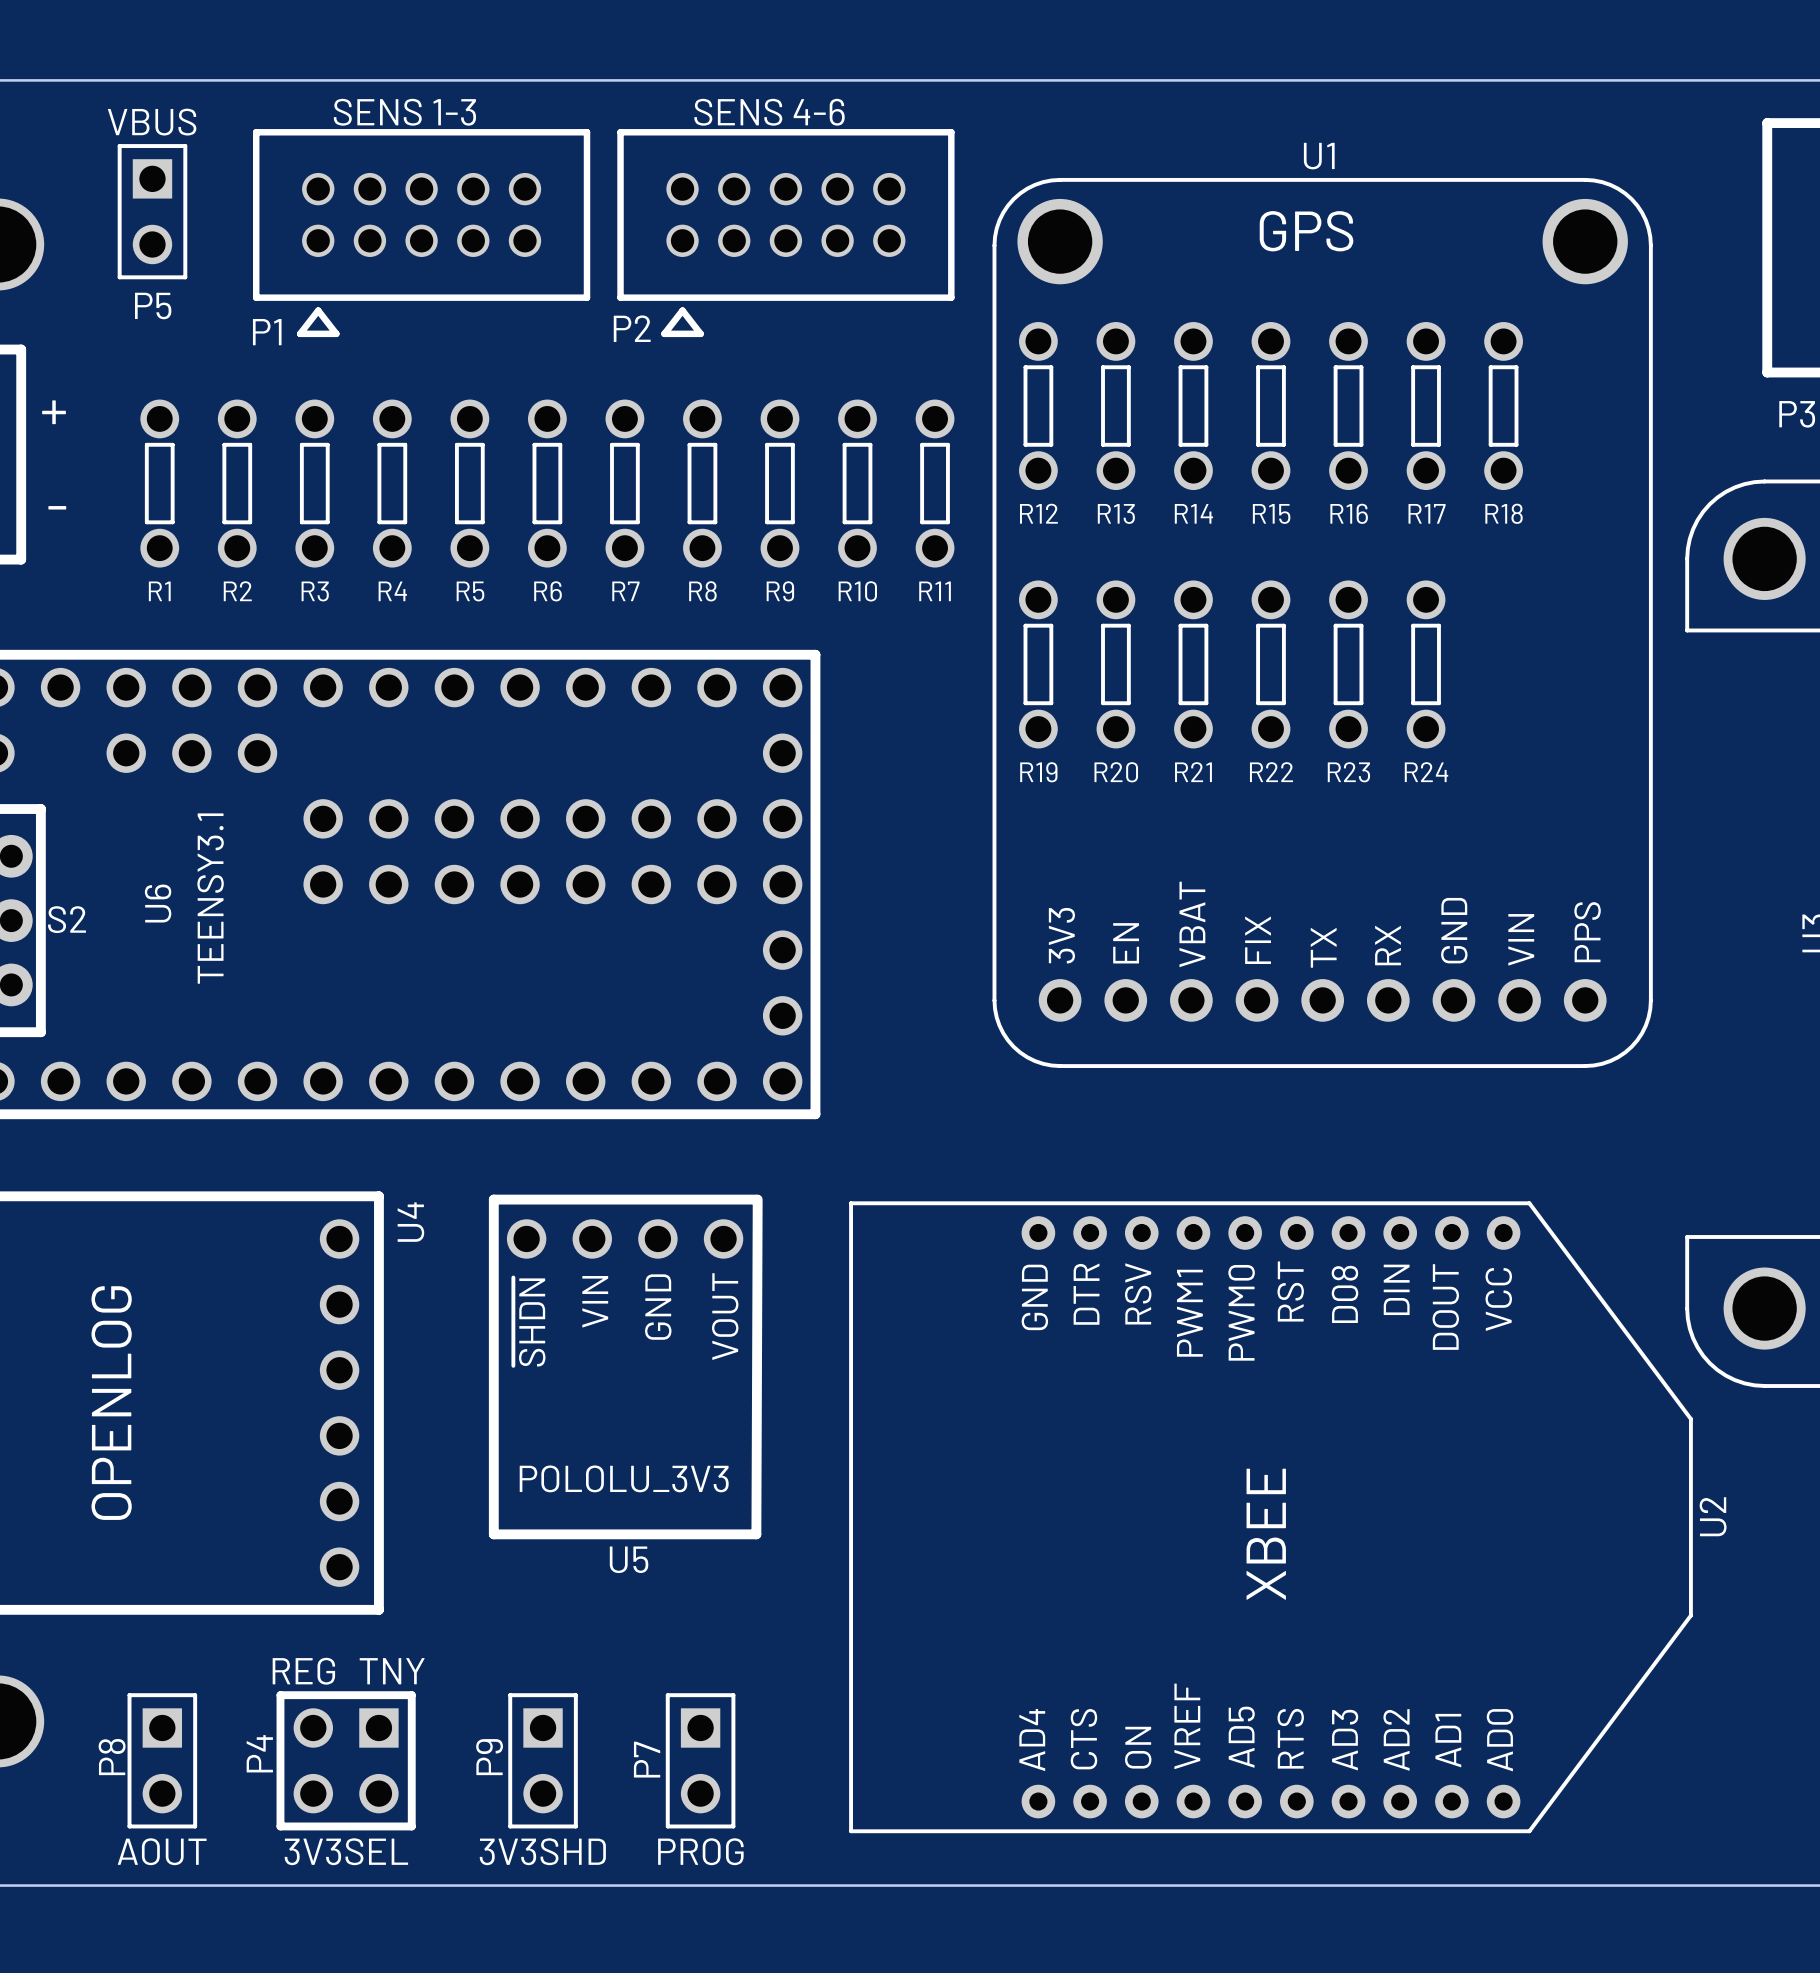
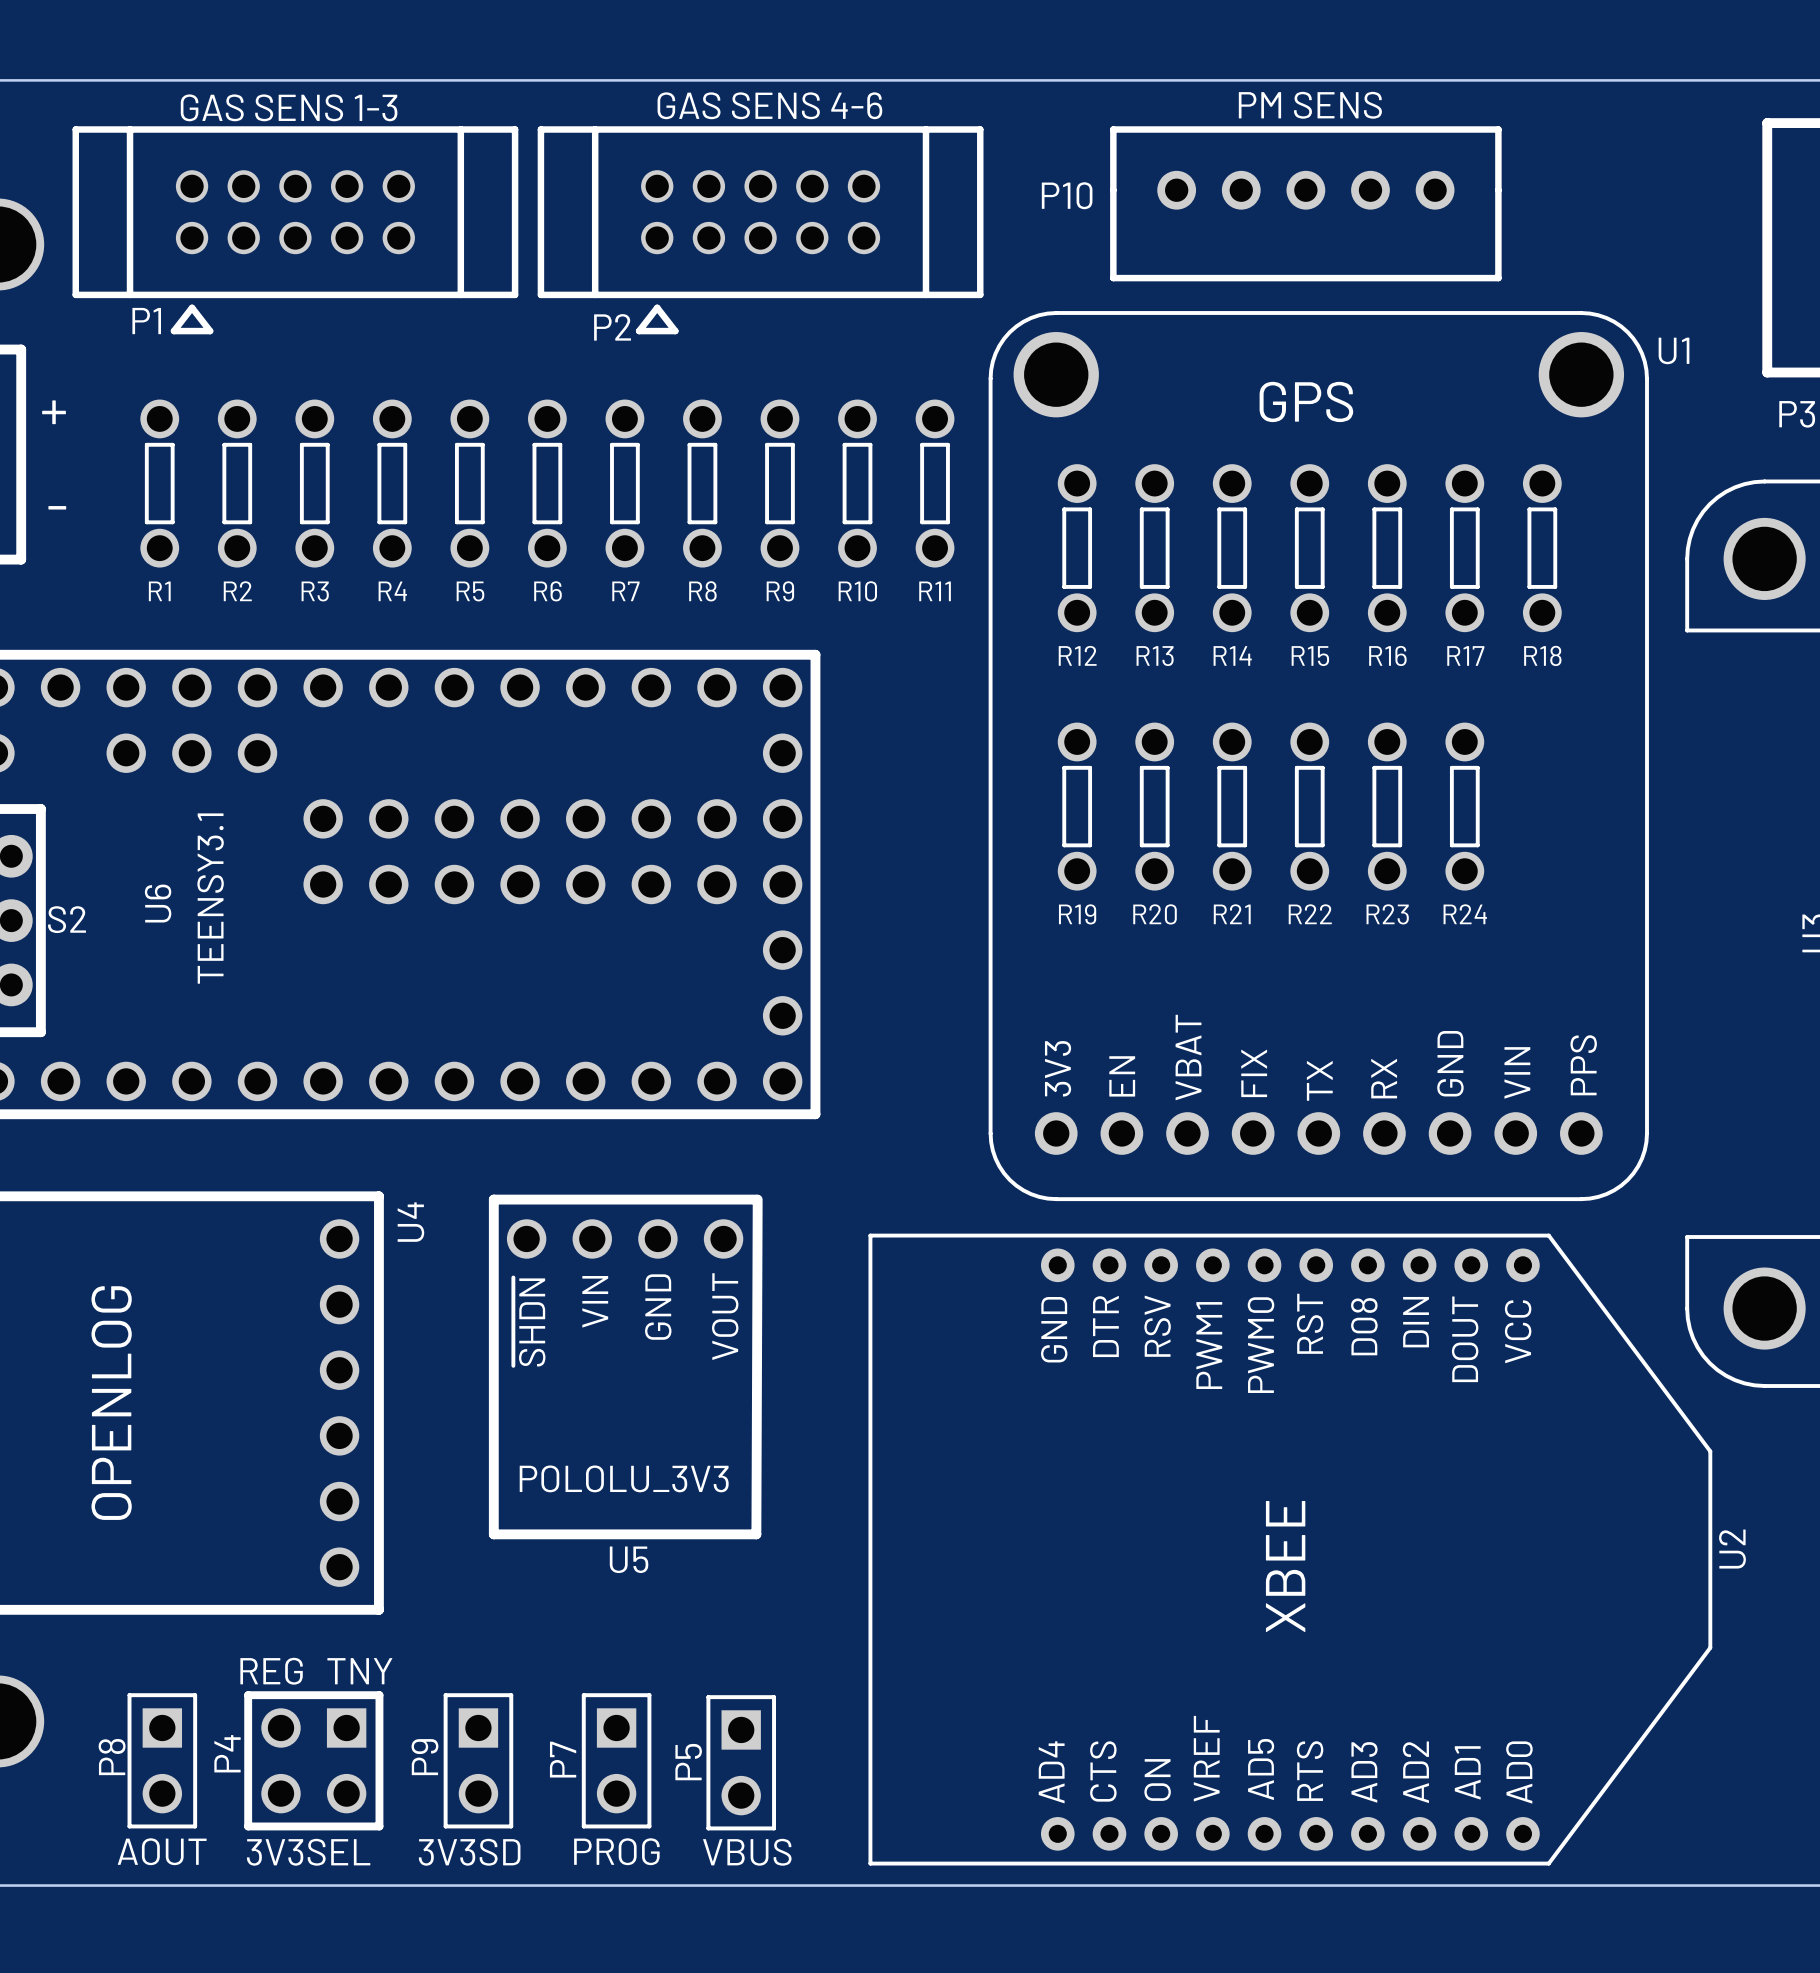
text: none -> PM SENS (1310, 105)
text: SENS 1-3 (404, 112) -> GAS SENS 1-3 (289, 107)
text: SENS 4-6 (769, 112) -> GAS SENS 4-6 (769, 105)
text: VBUS (152, 122) -> none
P1 footprint: [252, 129, 591, 338] -> [72, 126, 519, 335]
P2 footprint: [617, 129, 955, 338] -> [537, 126, 984, 335]
U1 name position: U1 (1319, 156) -> U1 (1674, 350)
P10: none -> (1305, 203)
P5 position: (152, 211) -> (741, 1762)
U1 value position: GPS (1306, 231) -> GPS (1306, 401)
P5 name rotation: 0° (153, 306) -> 90° counterclockwise (688, 1762)
P5 name position: P5 (153, 306) -> P5 (688, 1762)
R12 position: (1038, 406) -> (1077, 548)
R13 position: (1115, 406) -> (1154, 548)
R14 position: (1193, 406) -> (1232, 548)
R15 position: (1270, 406) -> (1309, 548)
R16 position: (1348, 406) -> (1387, 548)
R17 position: (1426, 406) -> (1464, 548)
R18 position: (1503, 406) -> (1542, 548)
U1 position: (1322, 622) -> (1318, 756)
R19 position: (1038, 664) -> (1077, 806)
R20 position: (1115, 664) -> (1154, 806)
R21 position: (1193, 664) -> (1232, 806)
R22 position: (1270, 664) -> (1309, 806)
R23 position: (1348, 664) -> (1387, 806)
R24 position: (1426, 664) -> (1464, 806)
U2 position: (1270, 1517) -> (1290, 1549)
text position: REG (303, 1671) -> REG (271, 1671)
text position: TNY (392, 1671) -> TNY (359, 1671)
P4 position: (346, 1760) -> (313, 1760)
P9 position: (543, 1760) -> (478, 1760)
P7 position: (700, 1760) -> (616, 1760)
text position: 3V3SEL (346, 1851) -> 3V3SEL (308, 1852)
text: 3V3SHD (542, 1851) -> 3V3SD (469, 1852)
text position: PROG (700, 1851) -> PROG (616, 1851)
text: none -> VBUS (747, 1852)

